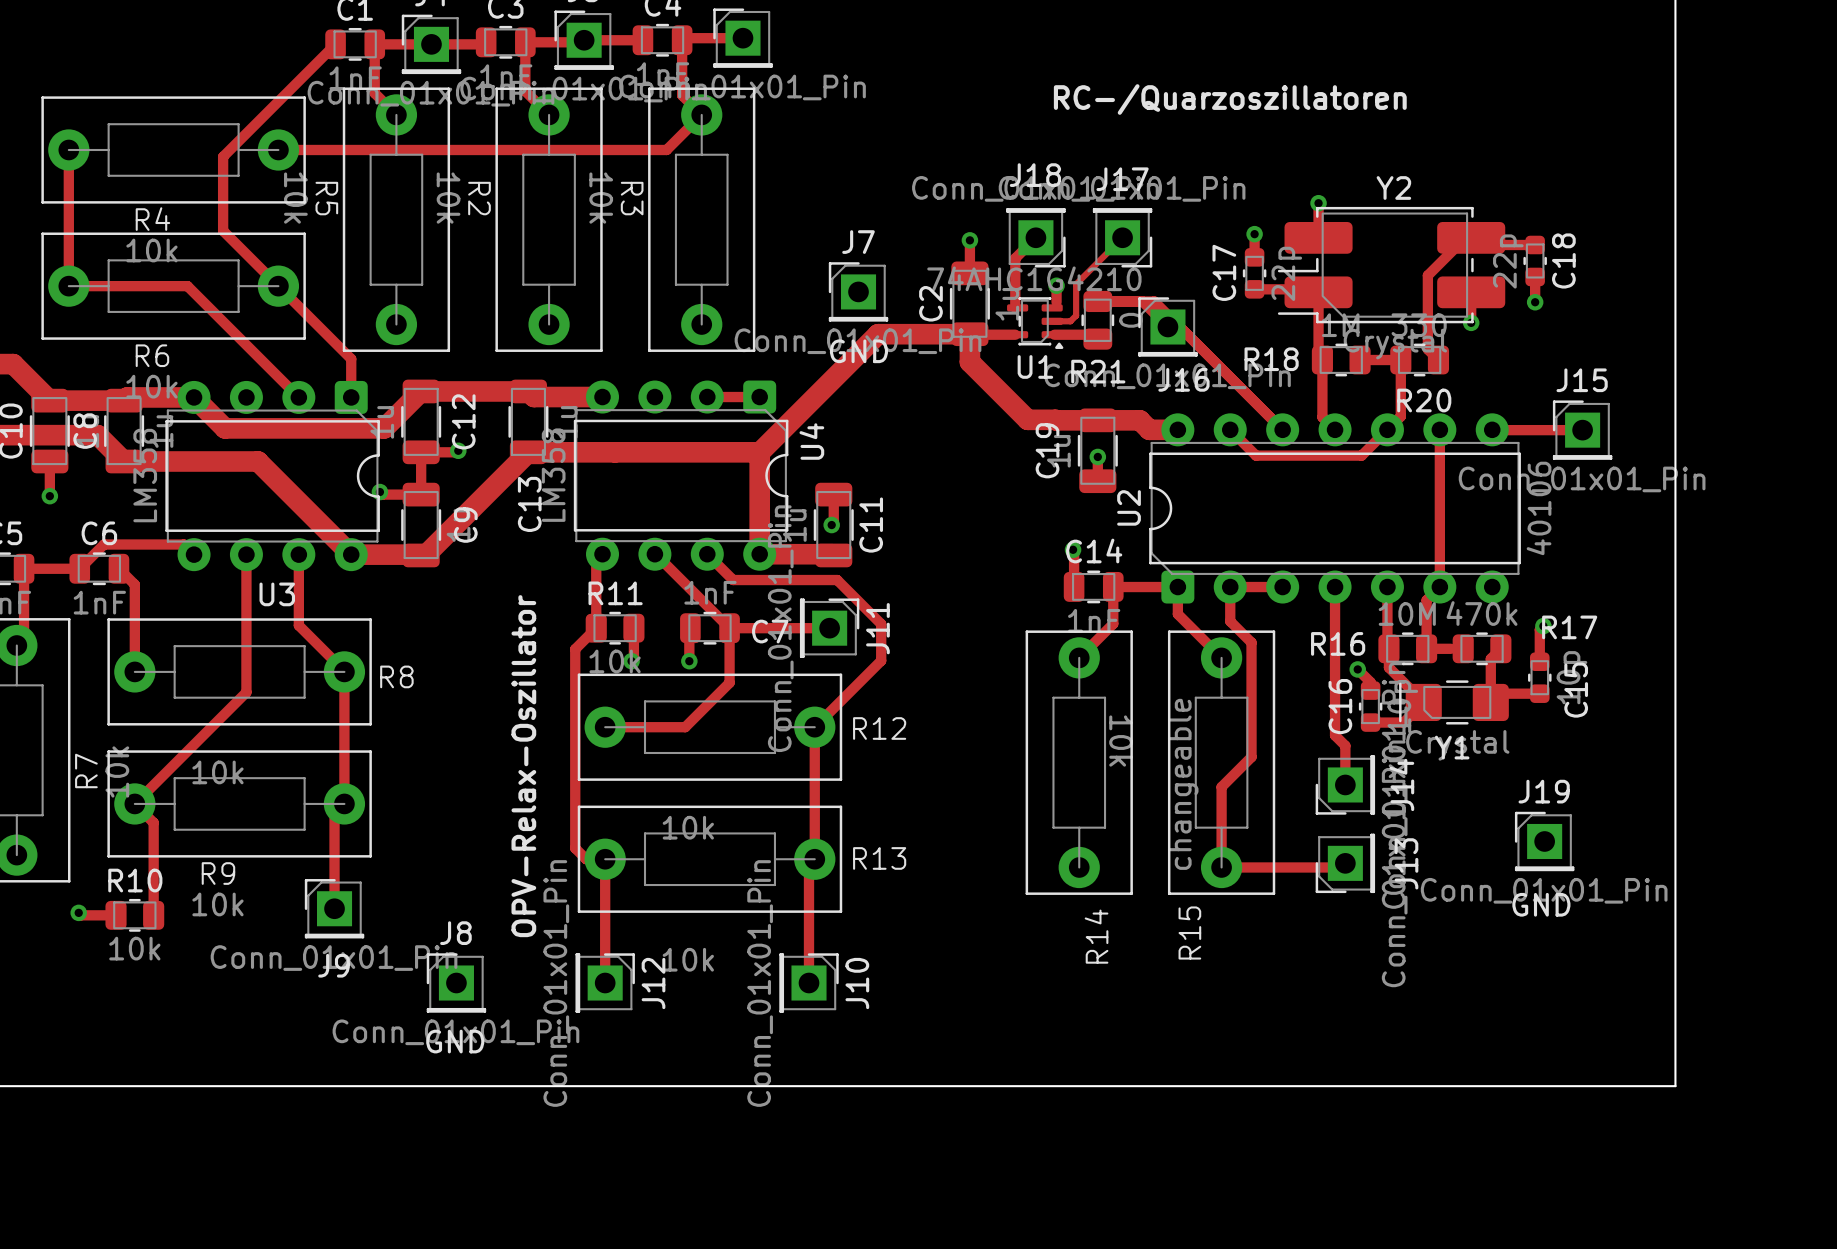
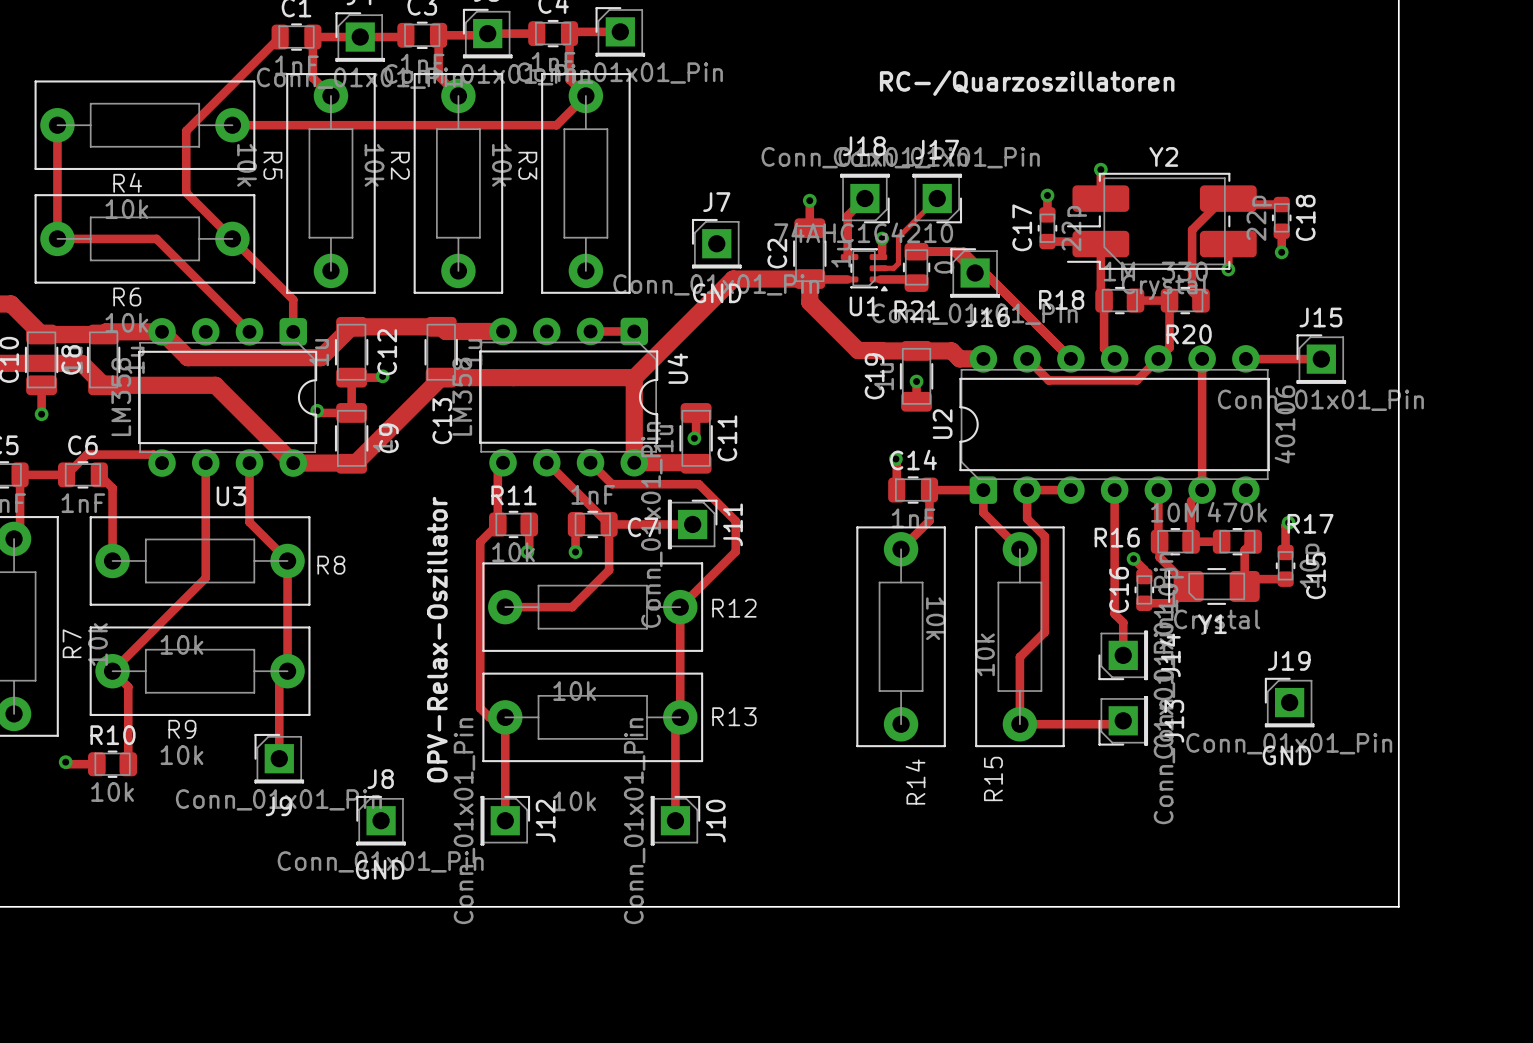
R15 value: changeable (1183, 784) -> 10k (984, 654)

